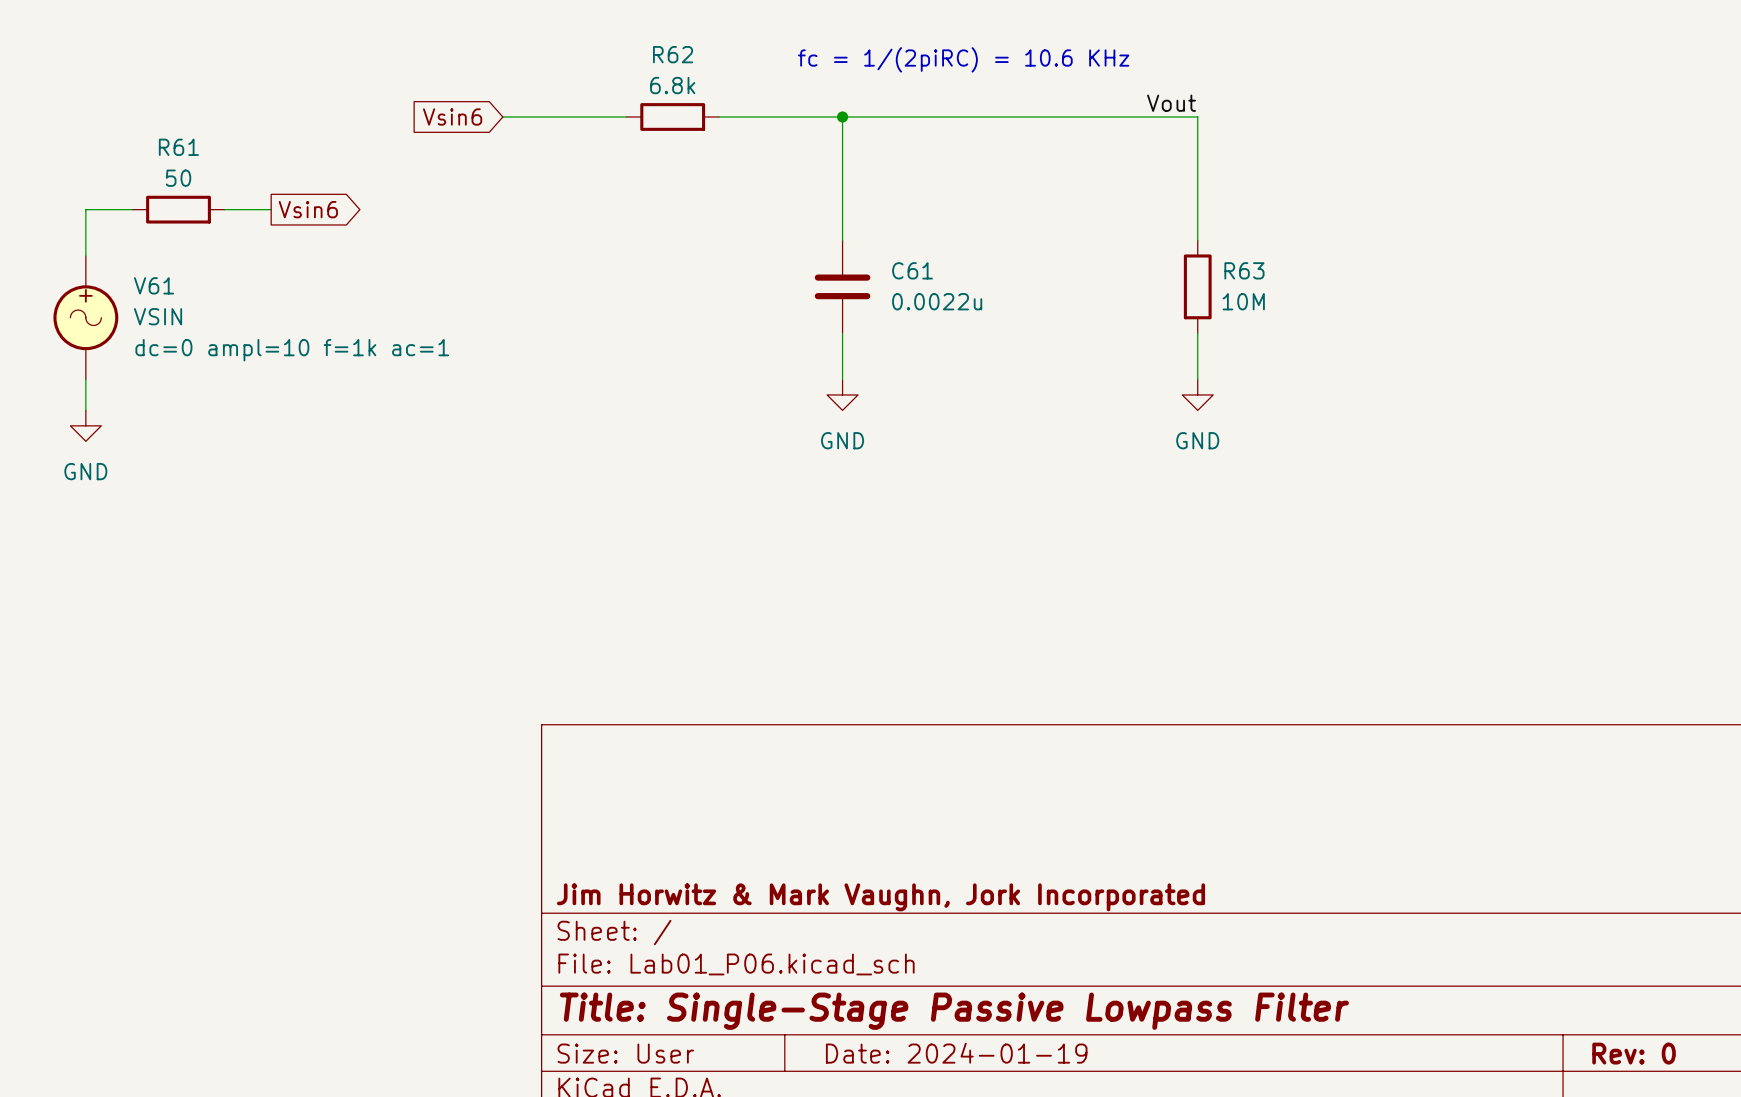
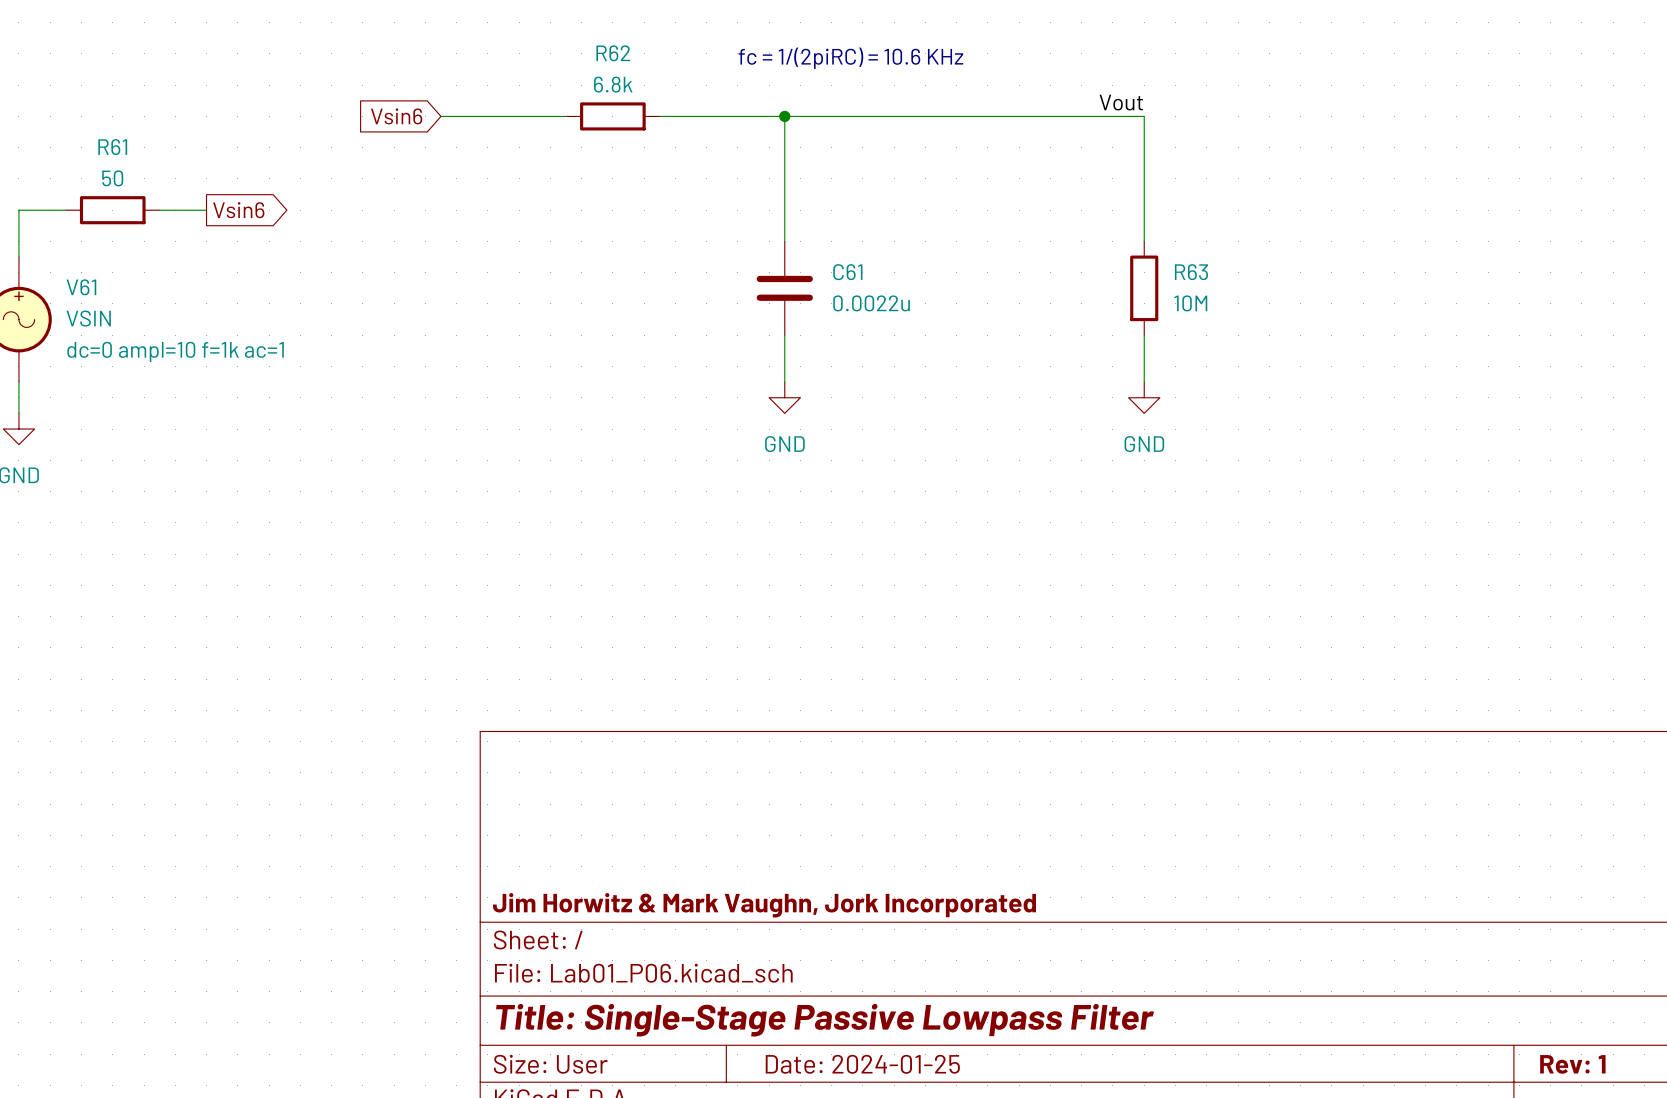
title block: Date: 2024-01-19 (956, 1053) -> Date: 2024-01-25 (862, 1064)
title block: Rev: 0 (1634, 1053) -> Rev: 1 (1572, 1064)

